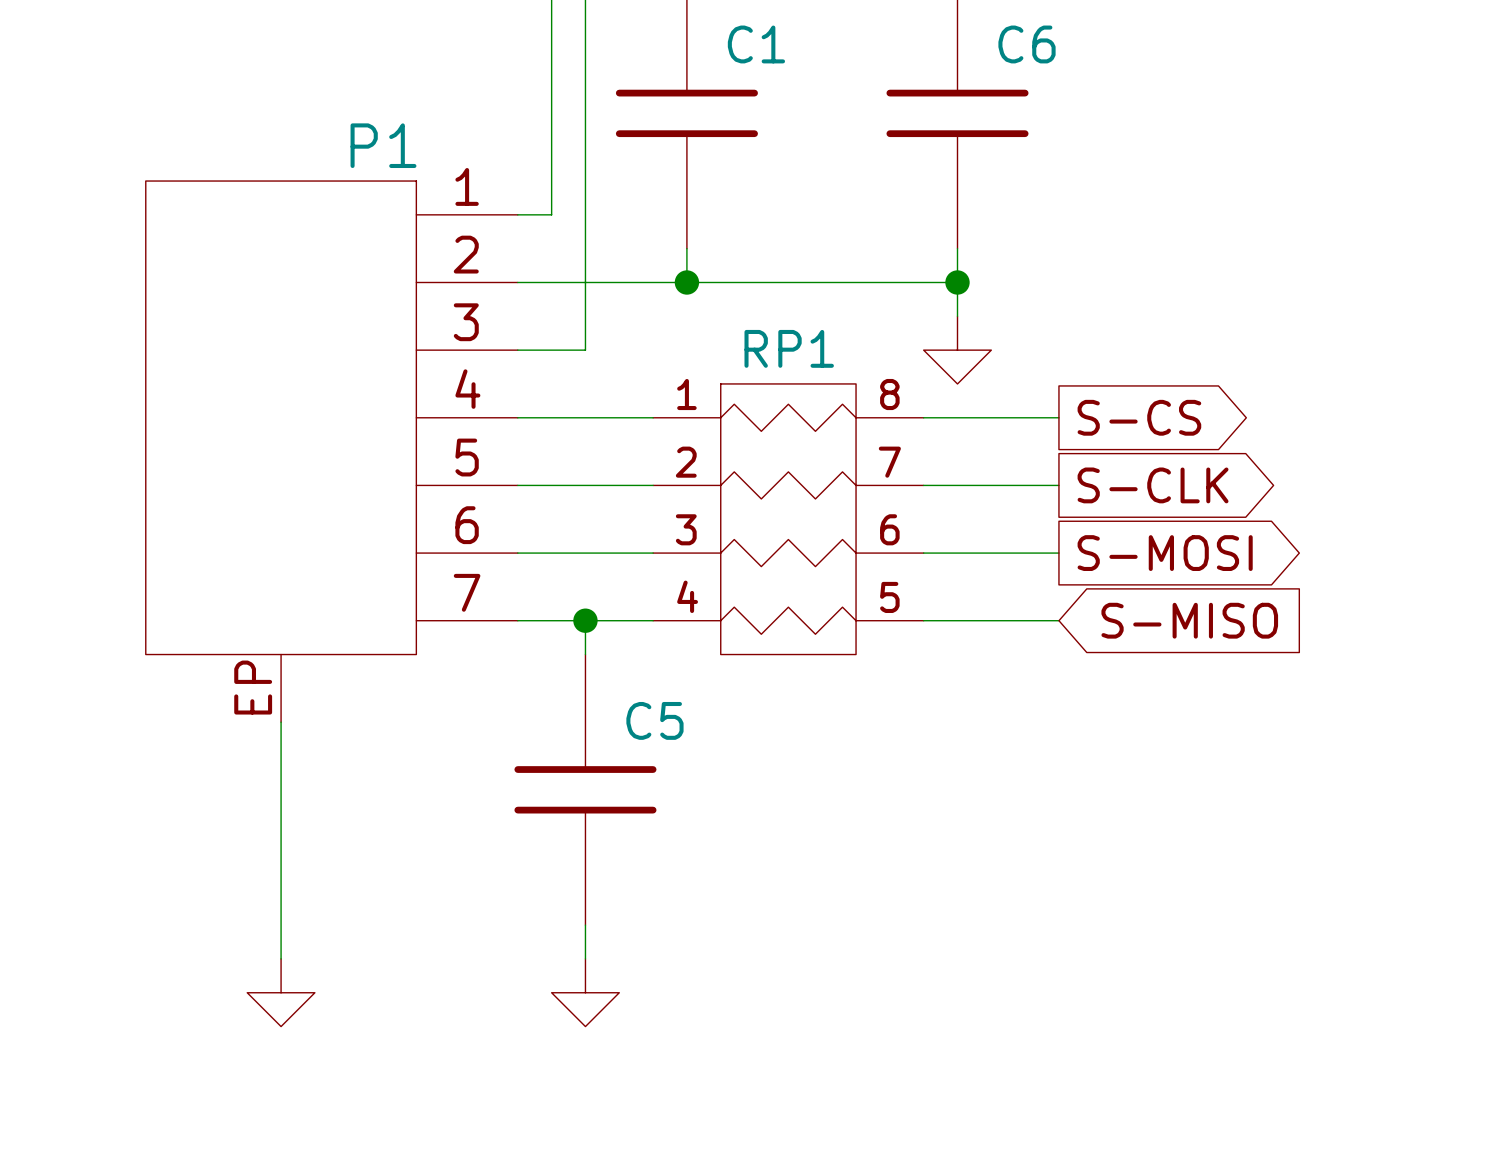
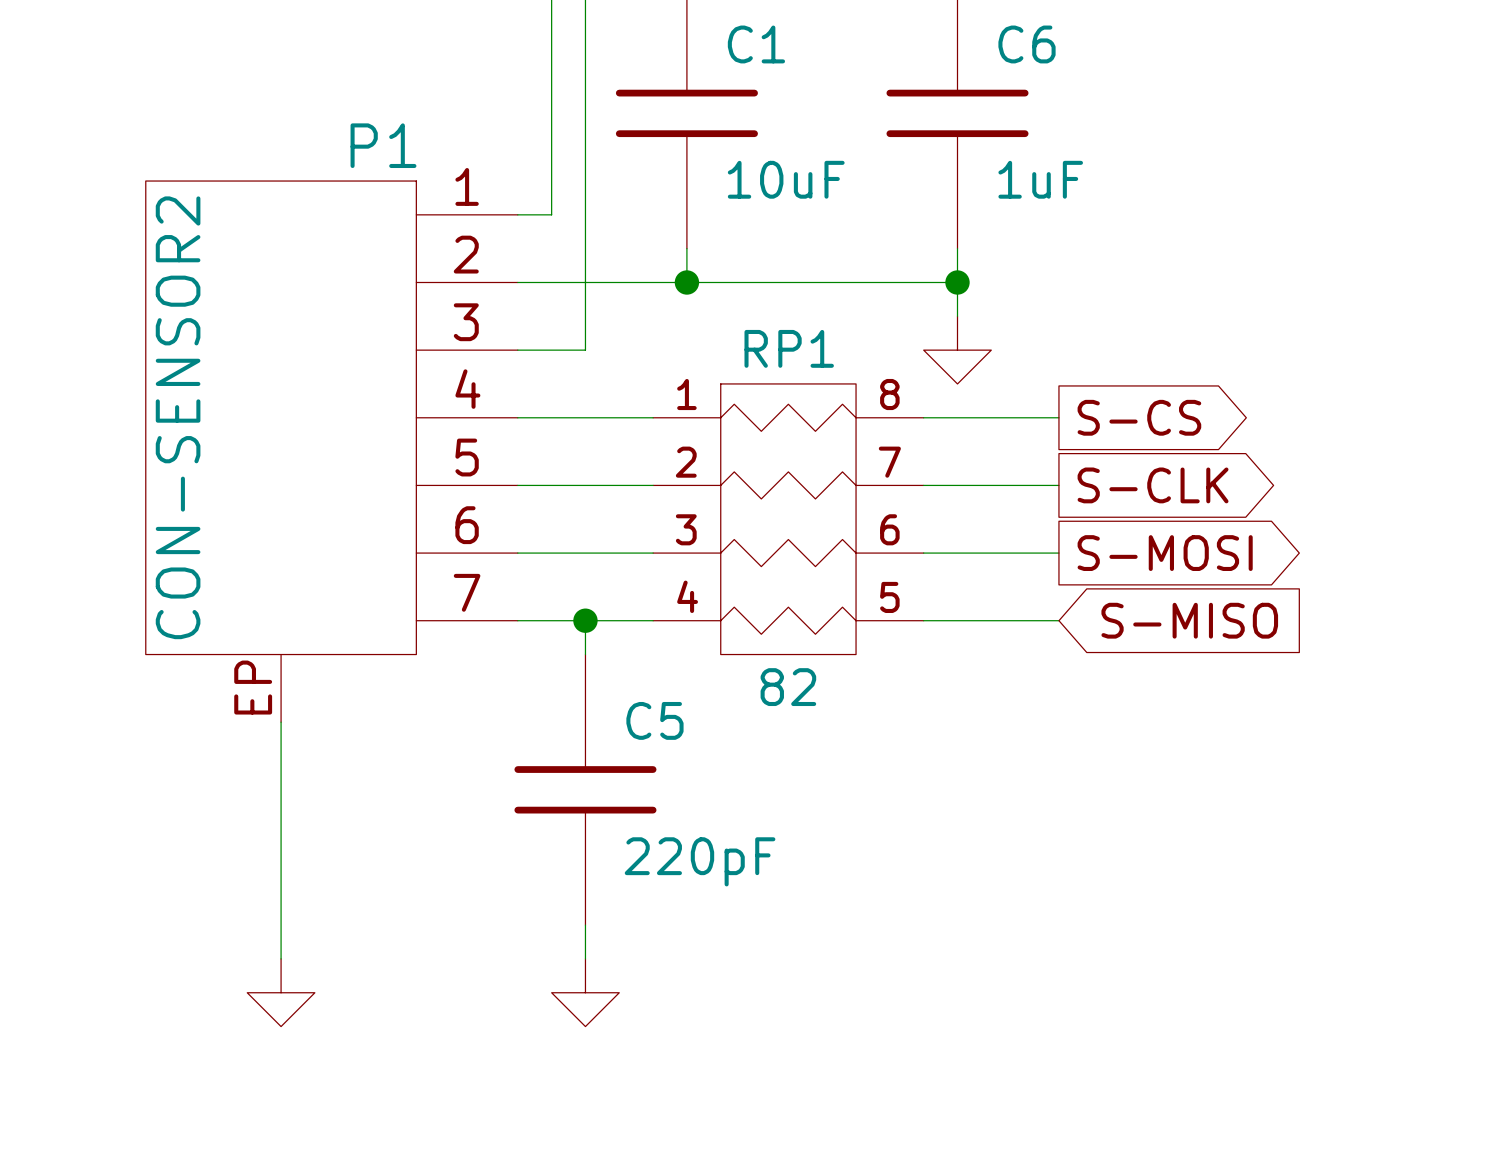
C1 value: none -> 10uF (786, 179)
C6 value: none -> 1uF (1040, 179)
P1 value: none -> CON-SENSOR2 (178, 417)
RP1 value: none -> 82 (788, 687)
C5 value: none -> 220pF (700, 861)

